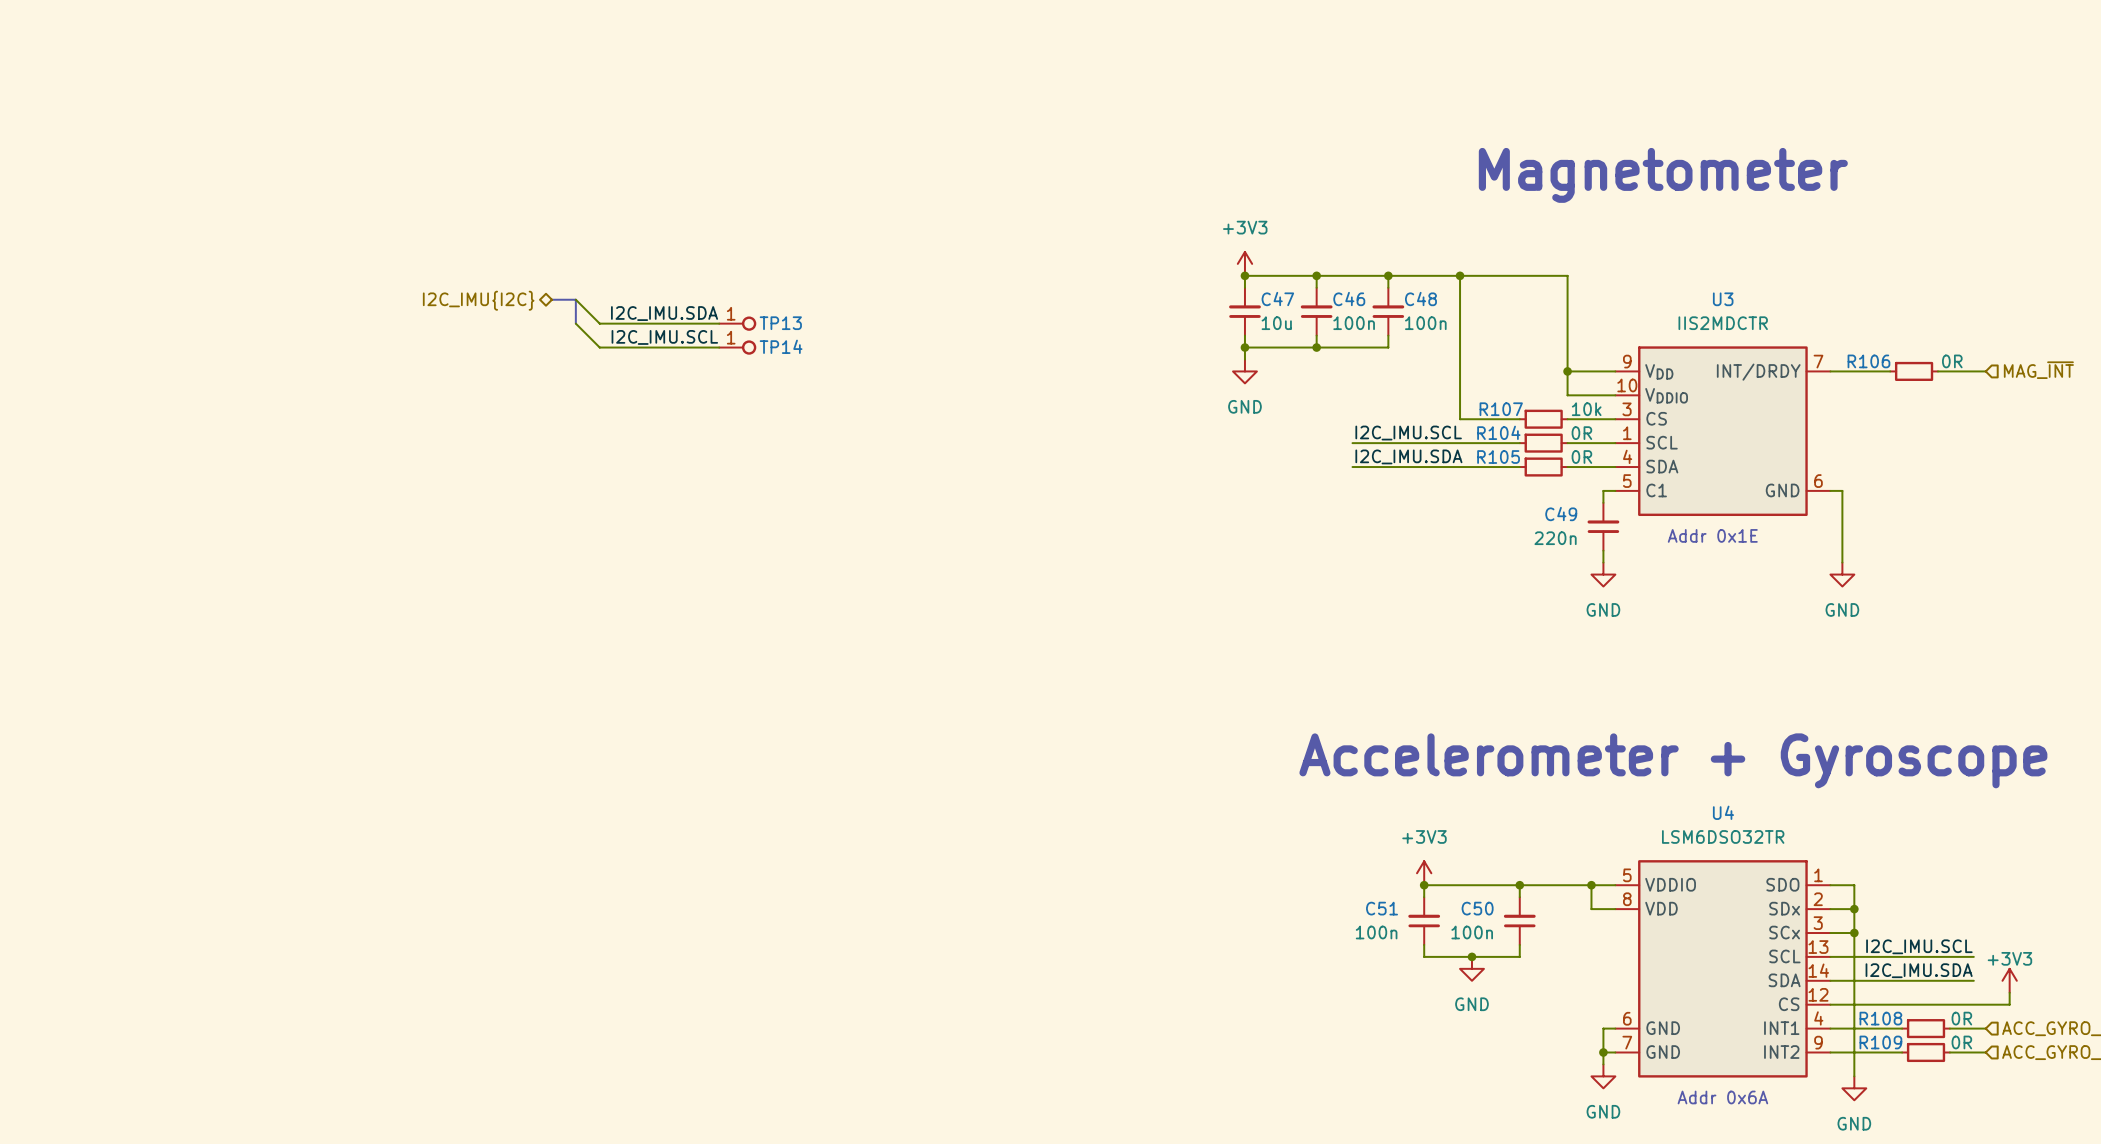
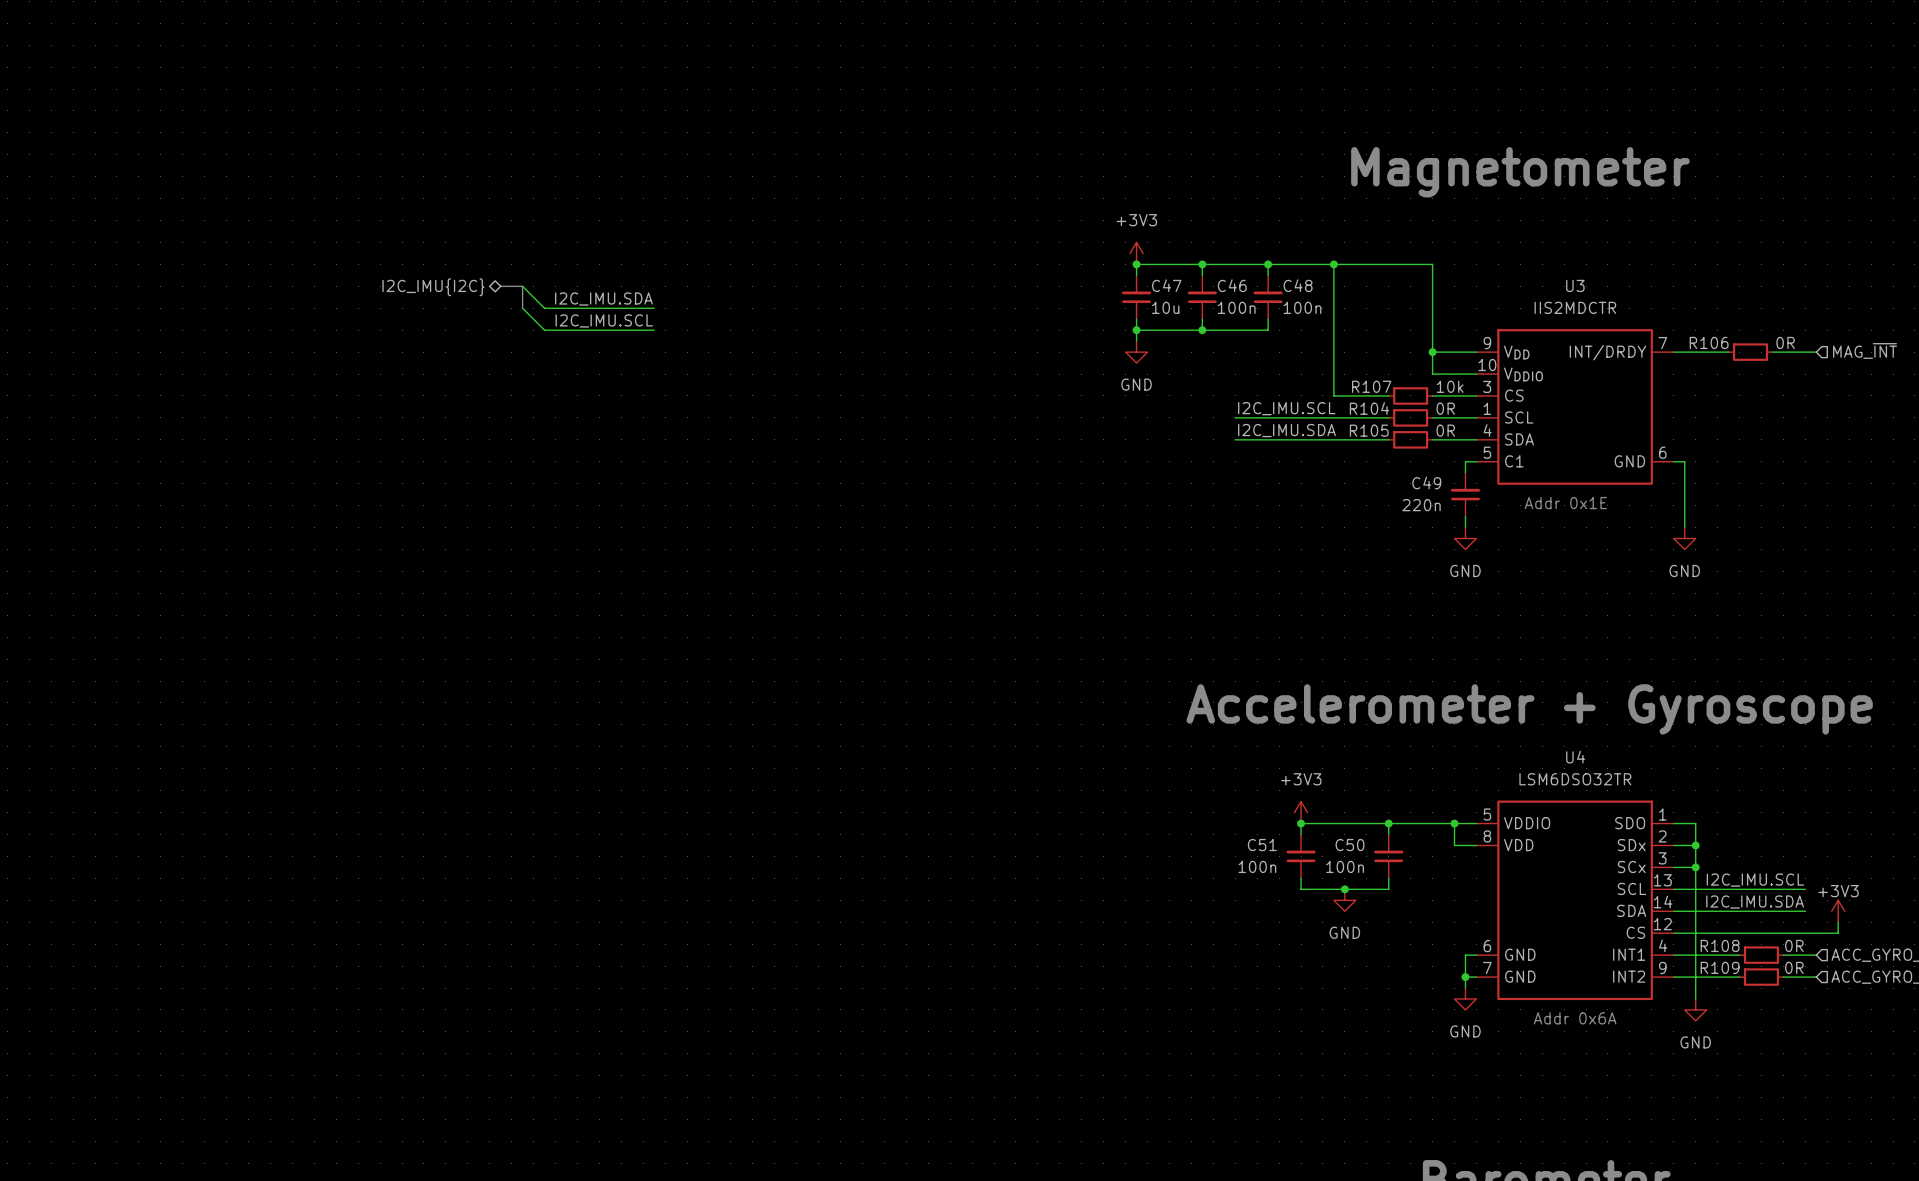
TP13: (737, 323) -> none
TP14: (737, 347) -> none

